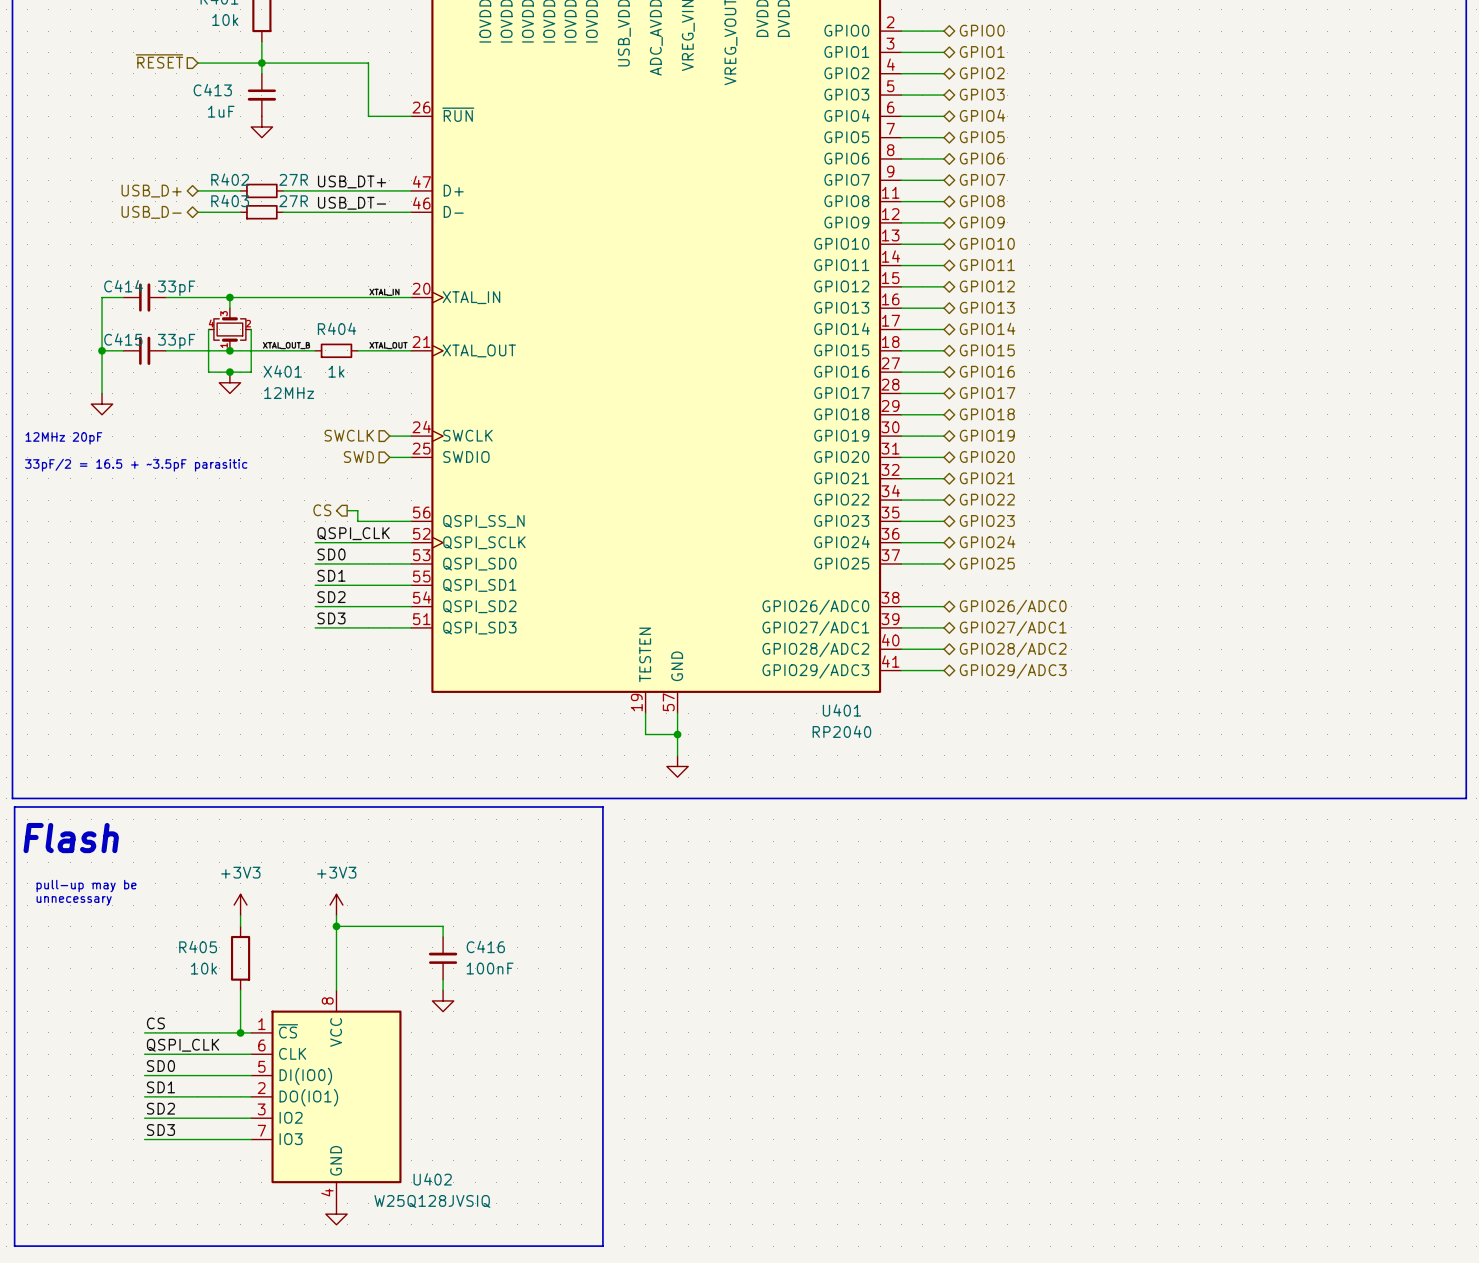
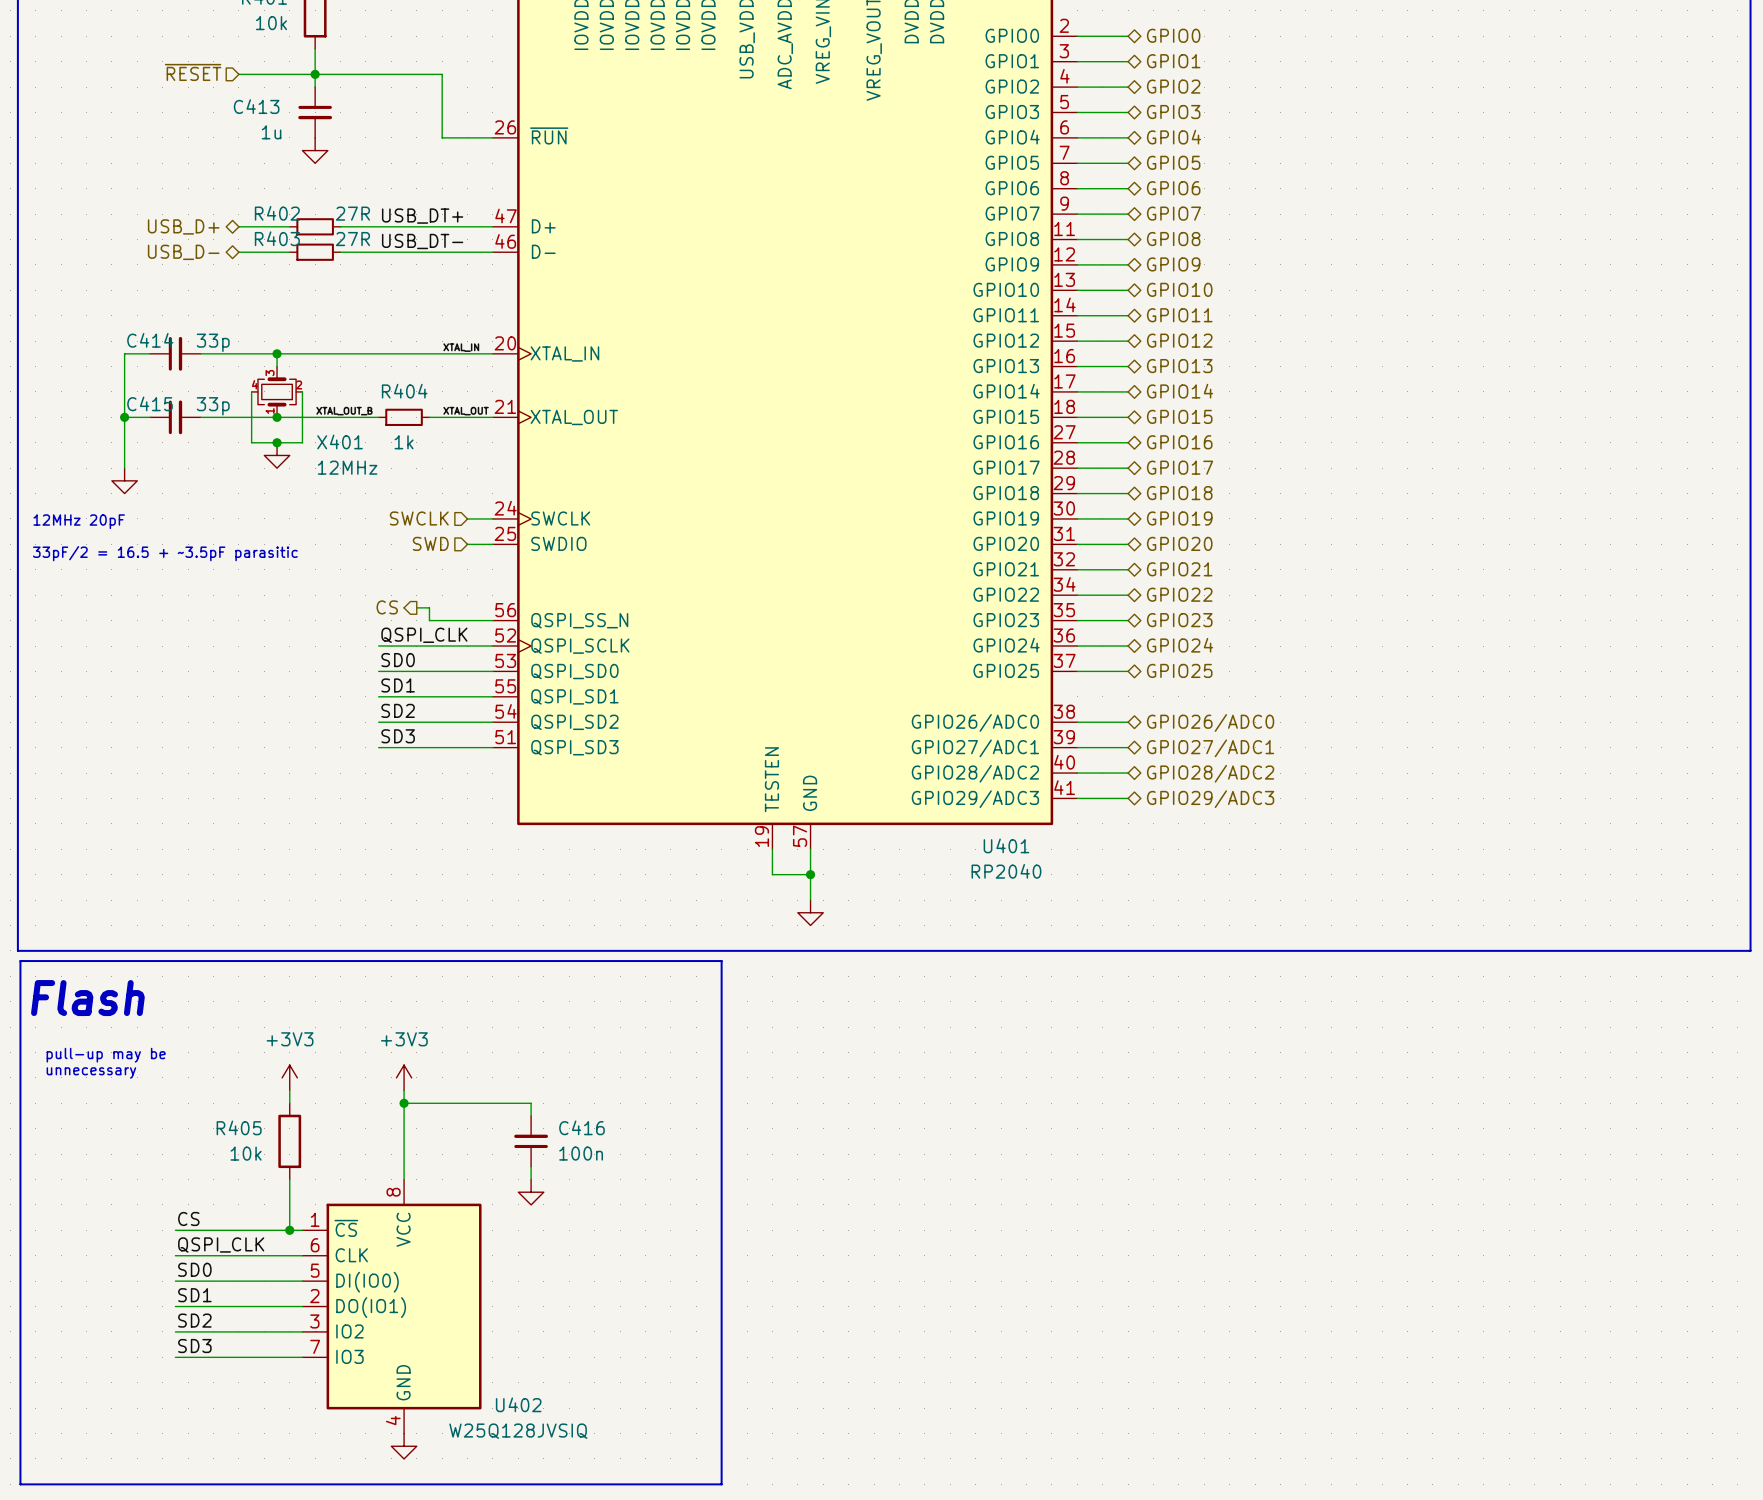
C413 value: 1uF (221, 111) -> 1u (271, 132)
C414 value: 33pF (176, 288) -> 33p (213, 342)
C415 value: 33pF (176, 341) -> 33p (213, 406)
C416 value: 100nF (490, 968) -> 100n (581, 1153)

